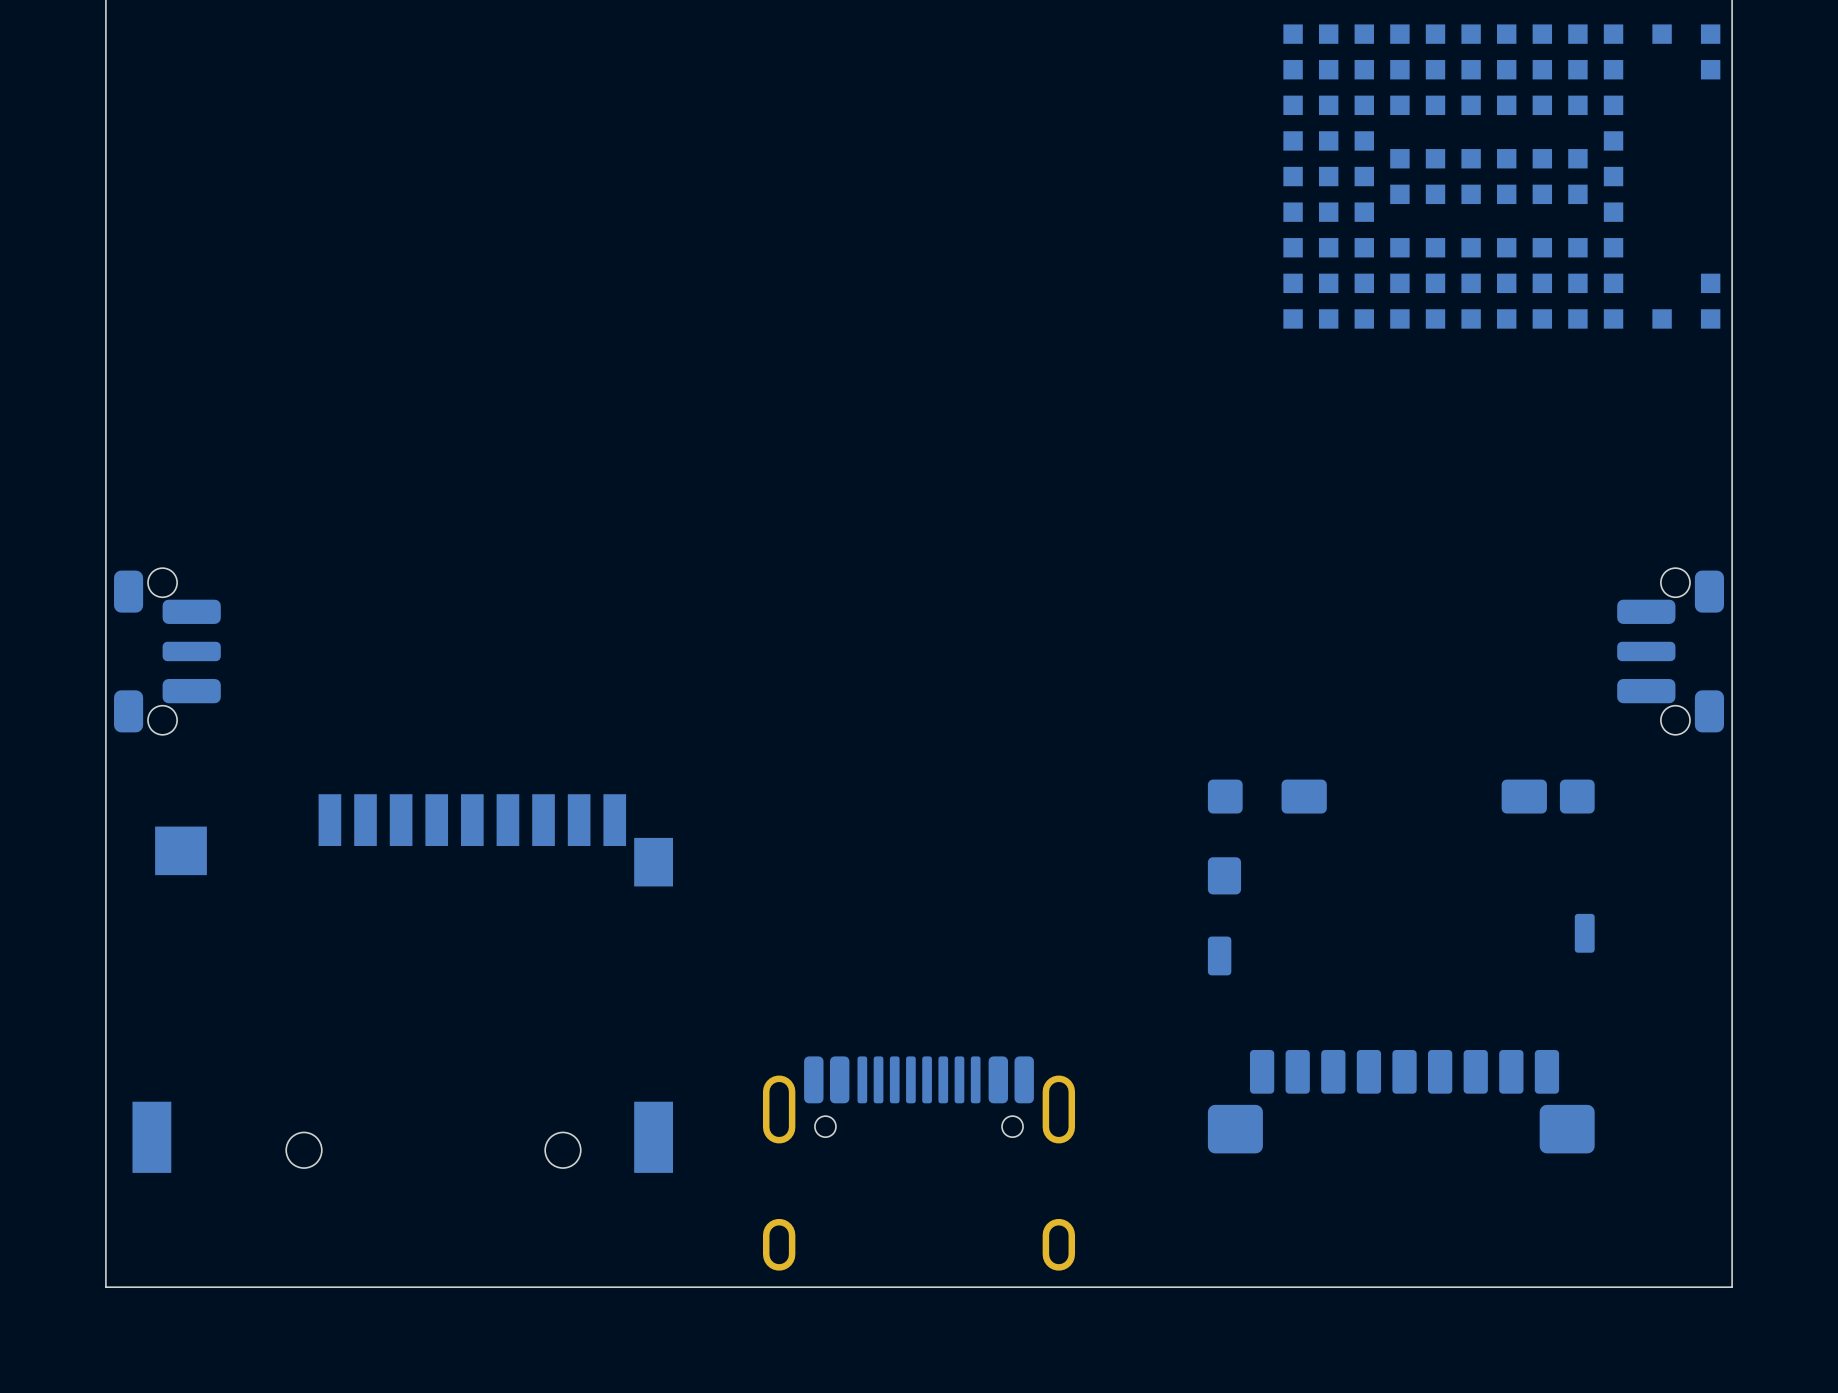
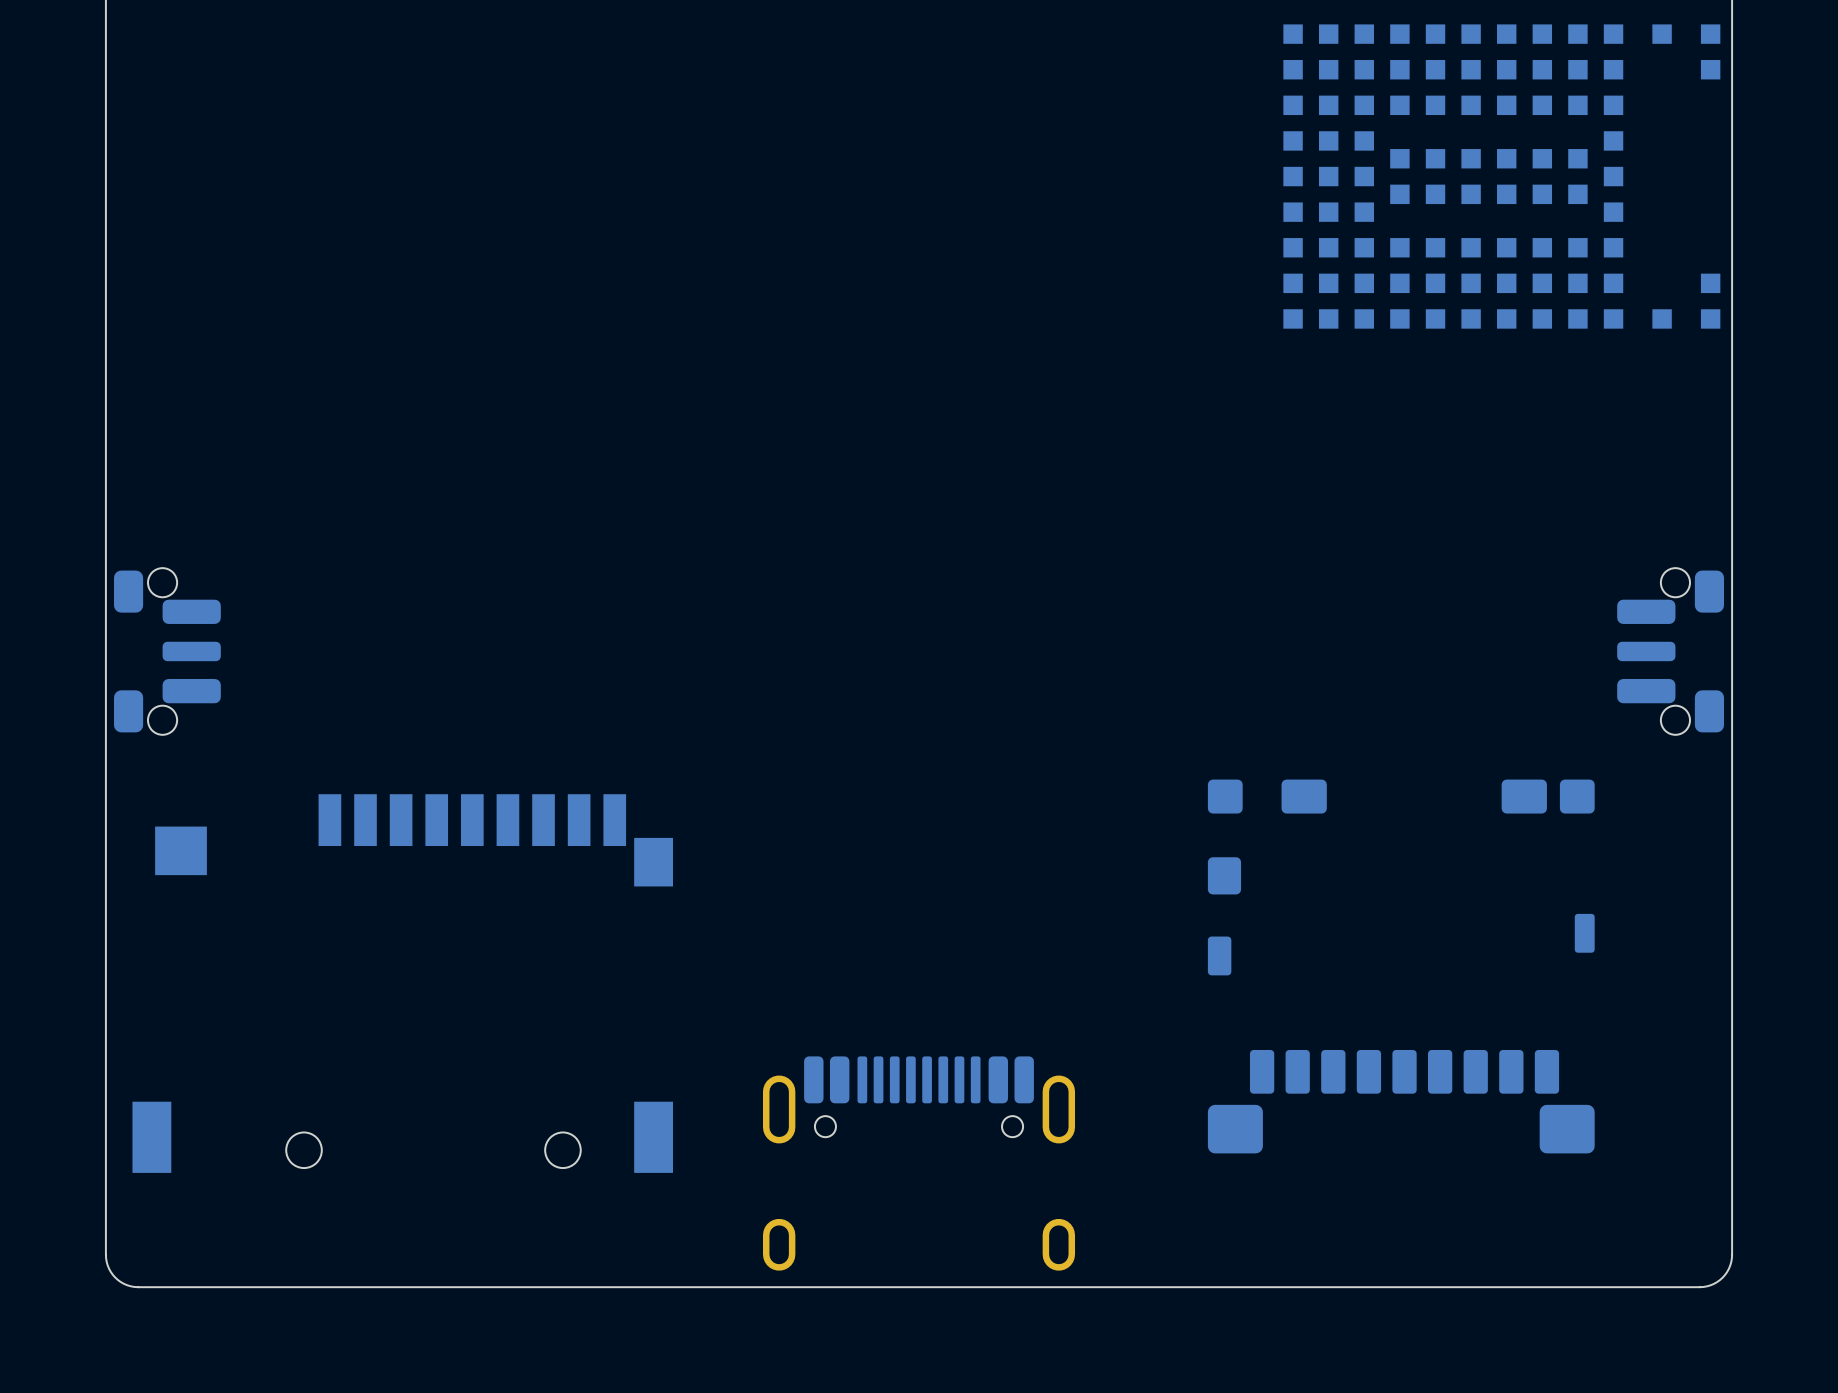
board edge: (105, 1254) (105, 1287) (138, 1287) -> (105, 1254) (107, 1265) (115, 1277) (124, 1283) (138, 1287)
board edge: (1732, 1254) (1732, 1287) (1699, 1287) -> (1732, 1254) (1728, 1268) (1722, 1277) (1713, 1283) (1699, 1287)

